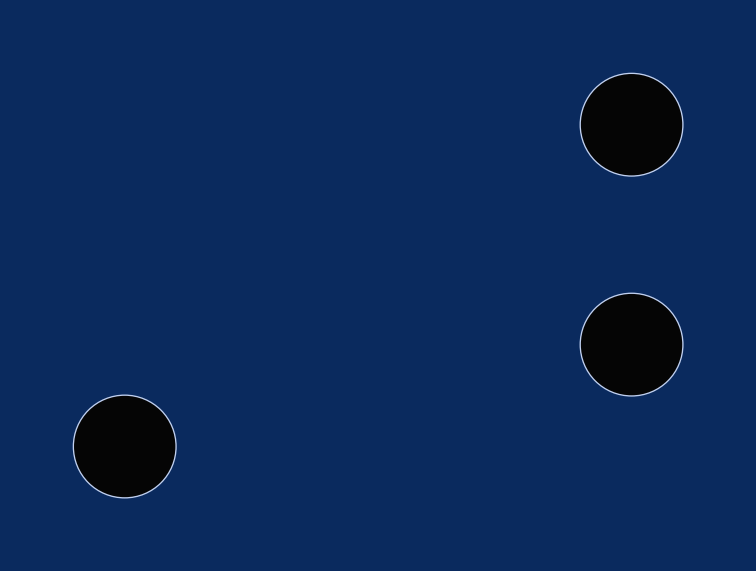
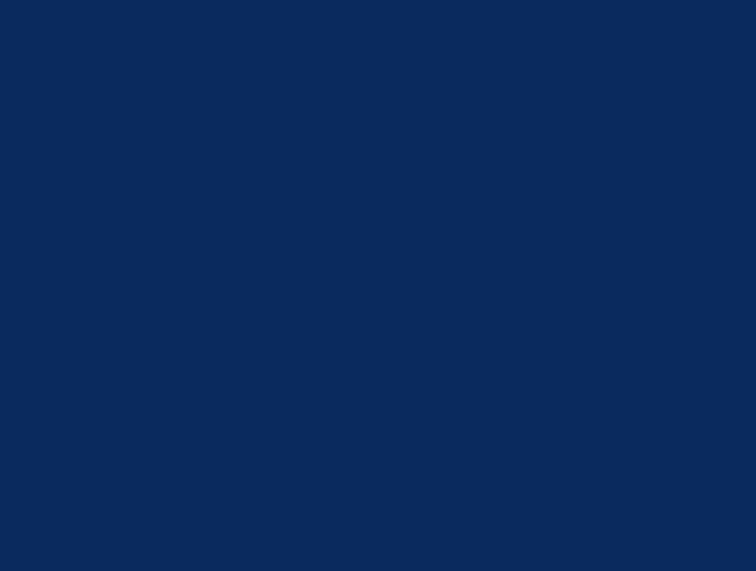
part: (631, 124) -> none
part: (631, 344) -> none
part: (124, 446) -> none

